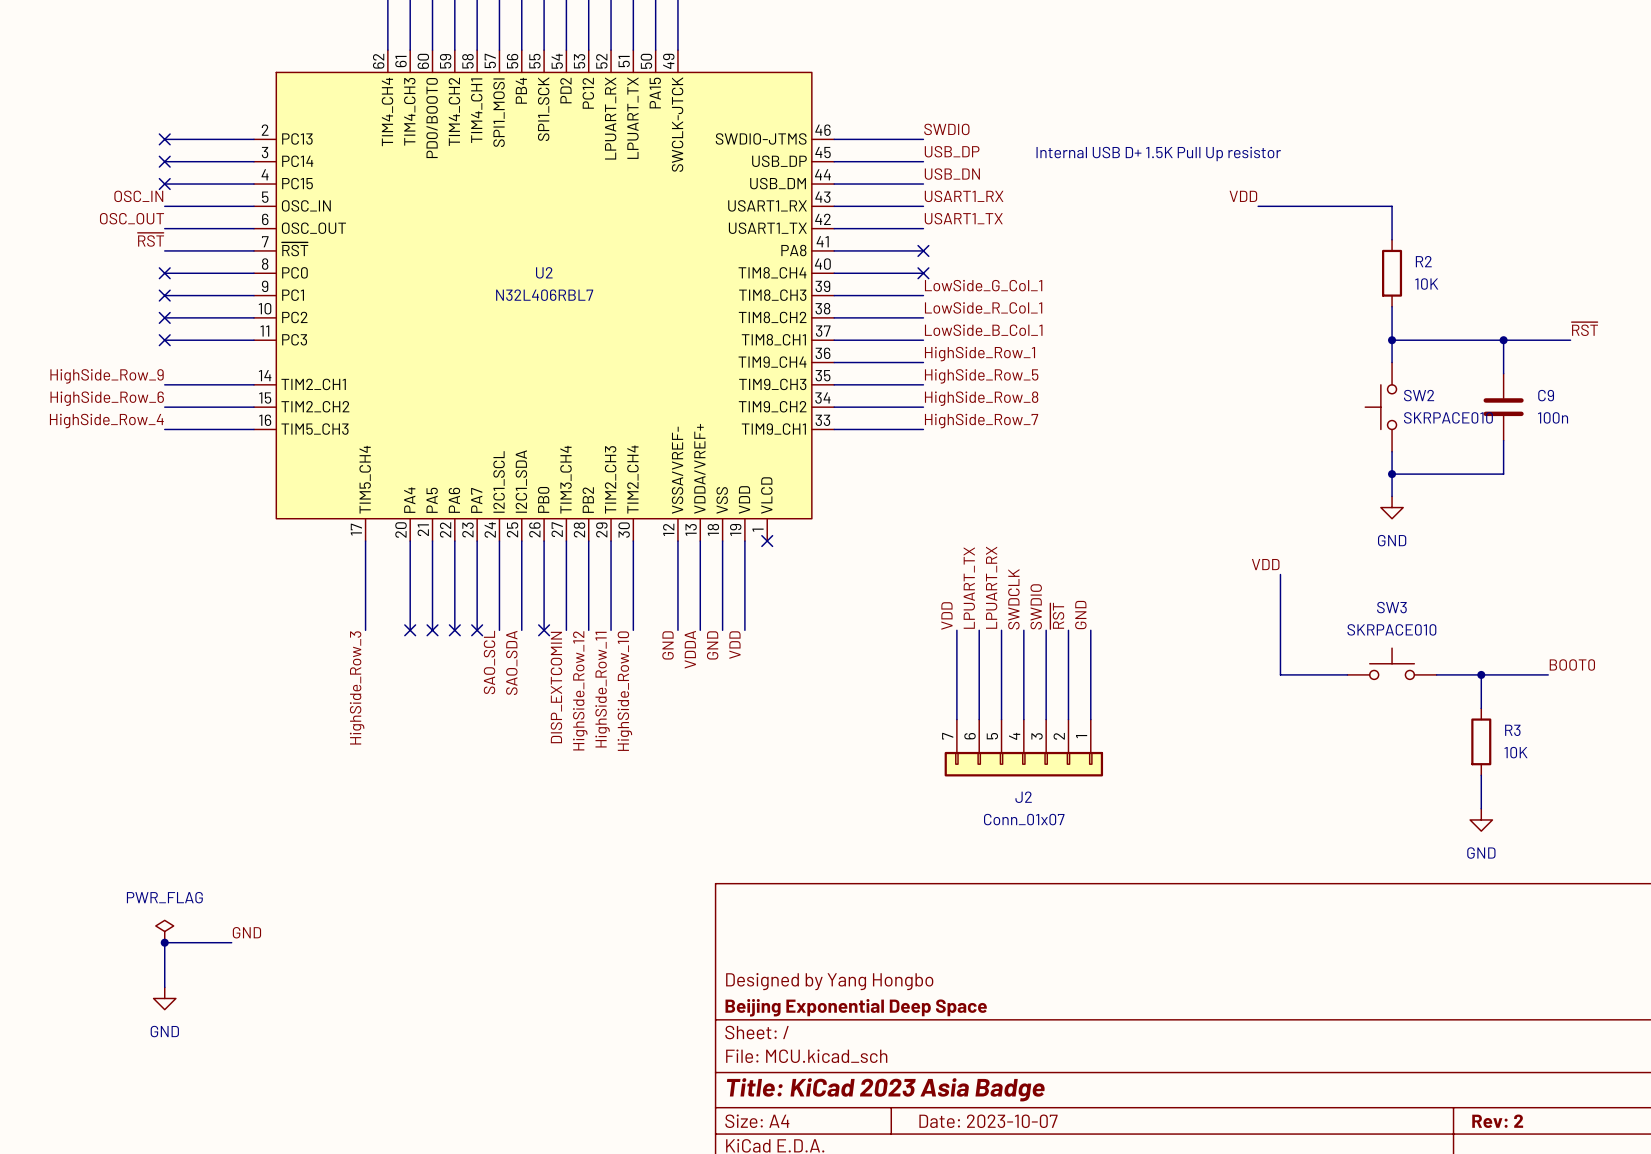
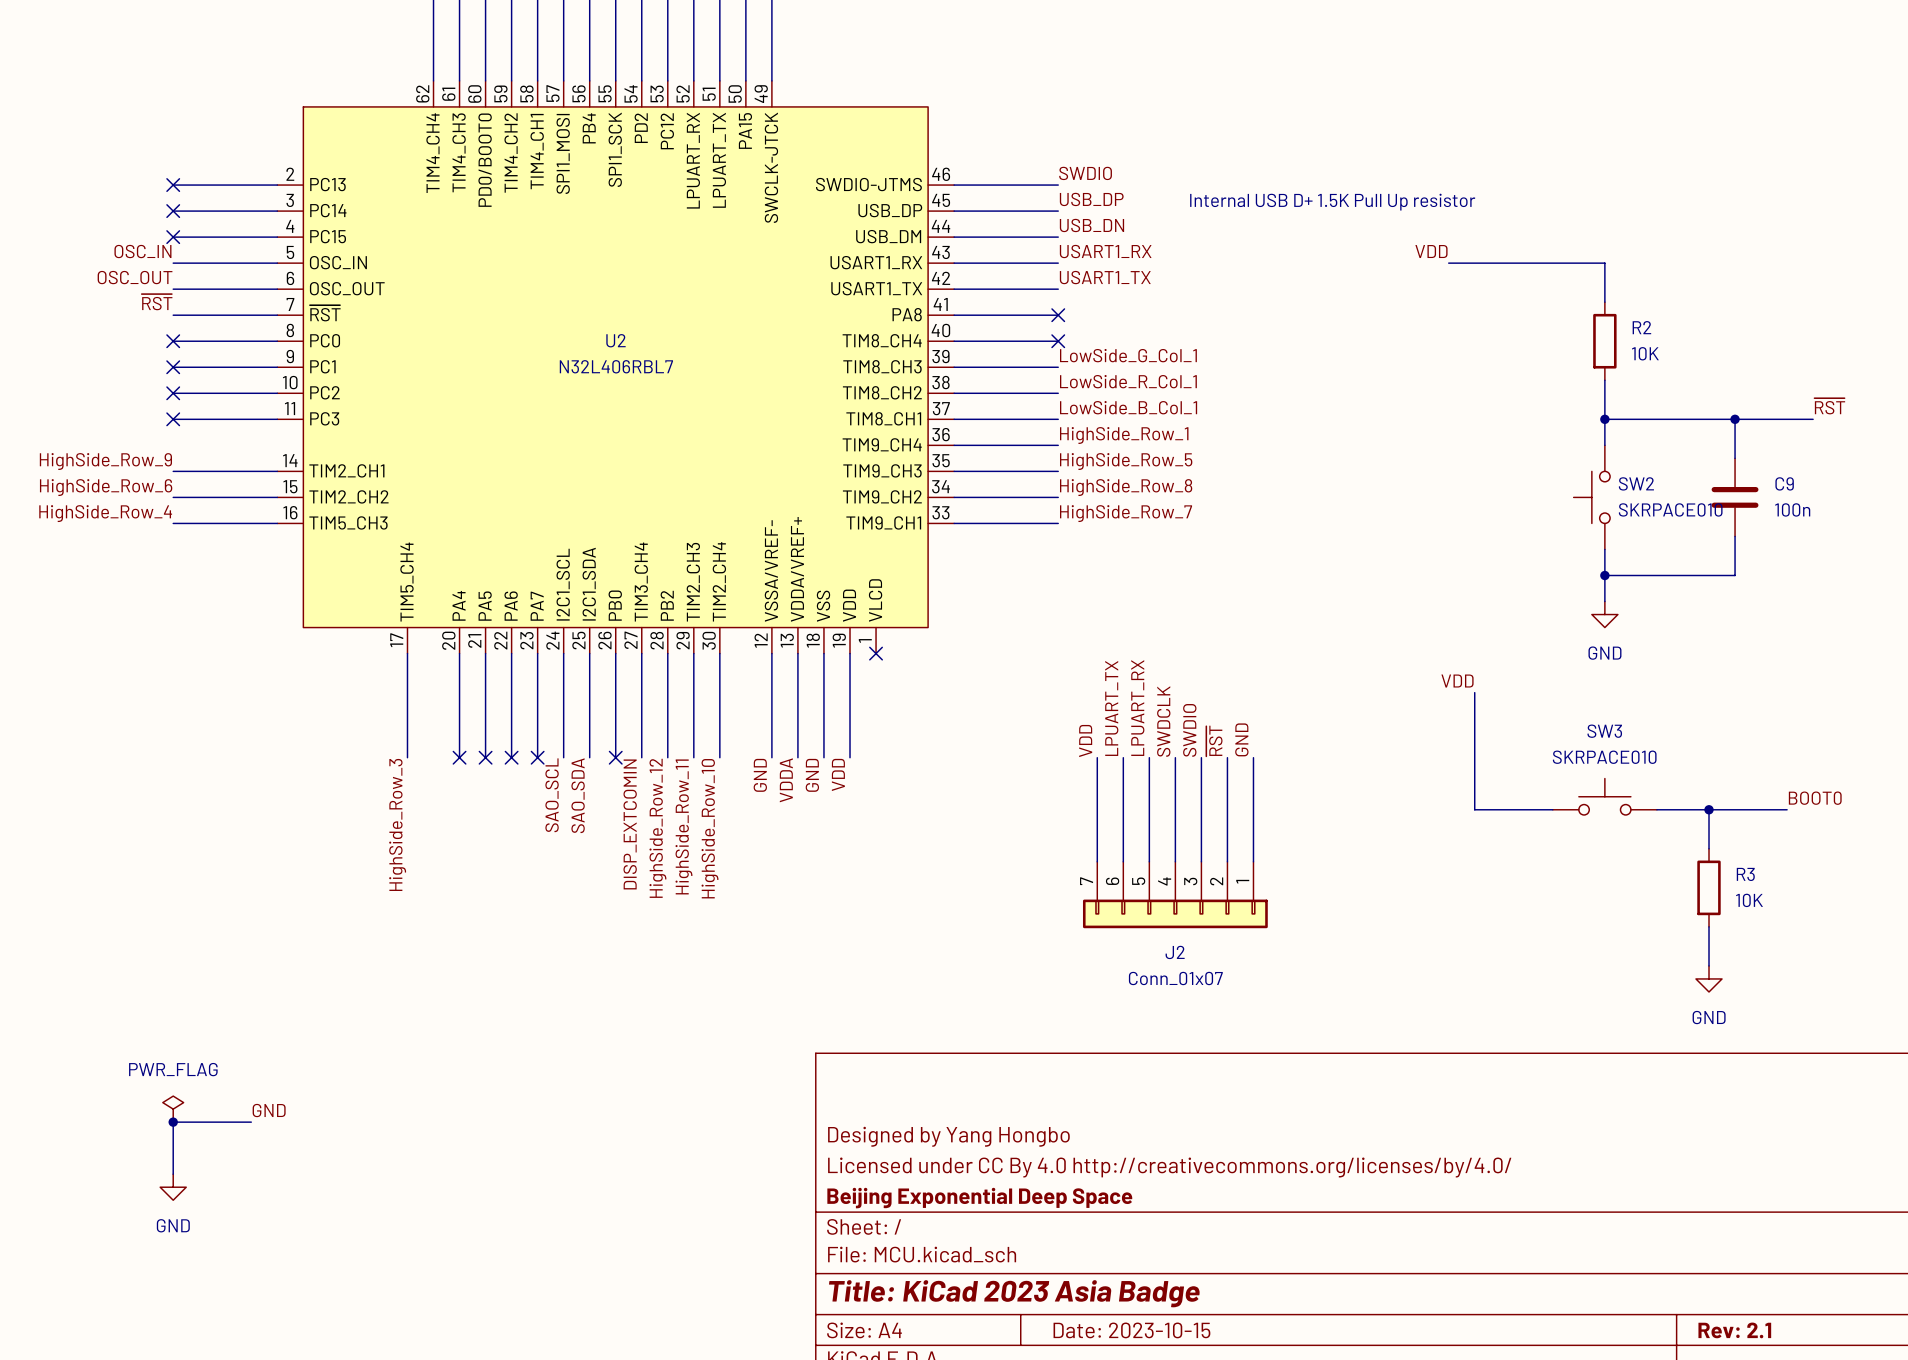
title block: none -> Designed by Yang Hongbo (948, 1136)
title block: Designed by Yang Hongbo (829, 981) -> Licensed under CC By 4.0 http://creativecommons.org/licenses/by/4.0/ (1169, 1167)
title block: Date: 2023-10-07 (988, 1121) -> Date: 2023-10-15 (1131, 1330)
title block: Rev: 2 (1497, 1121) -> Rev: 2.1 (1734, 1330)

